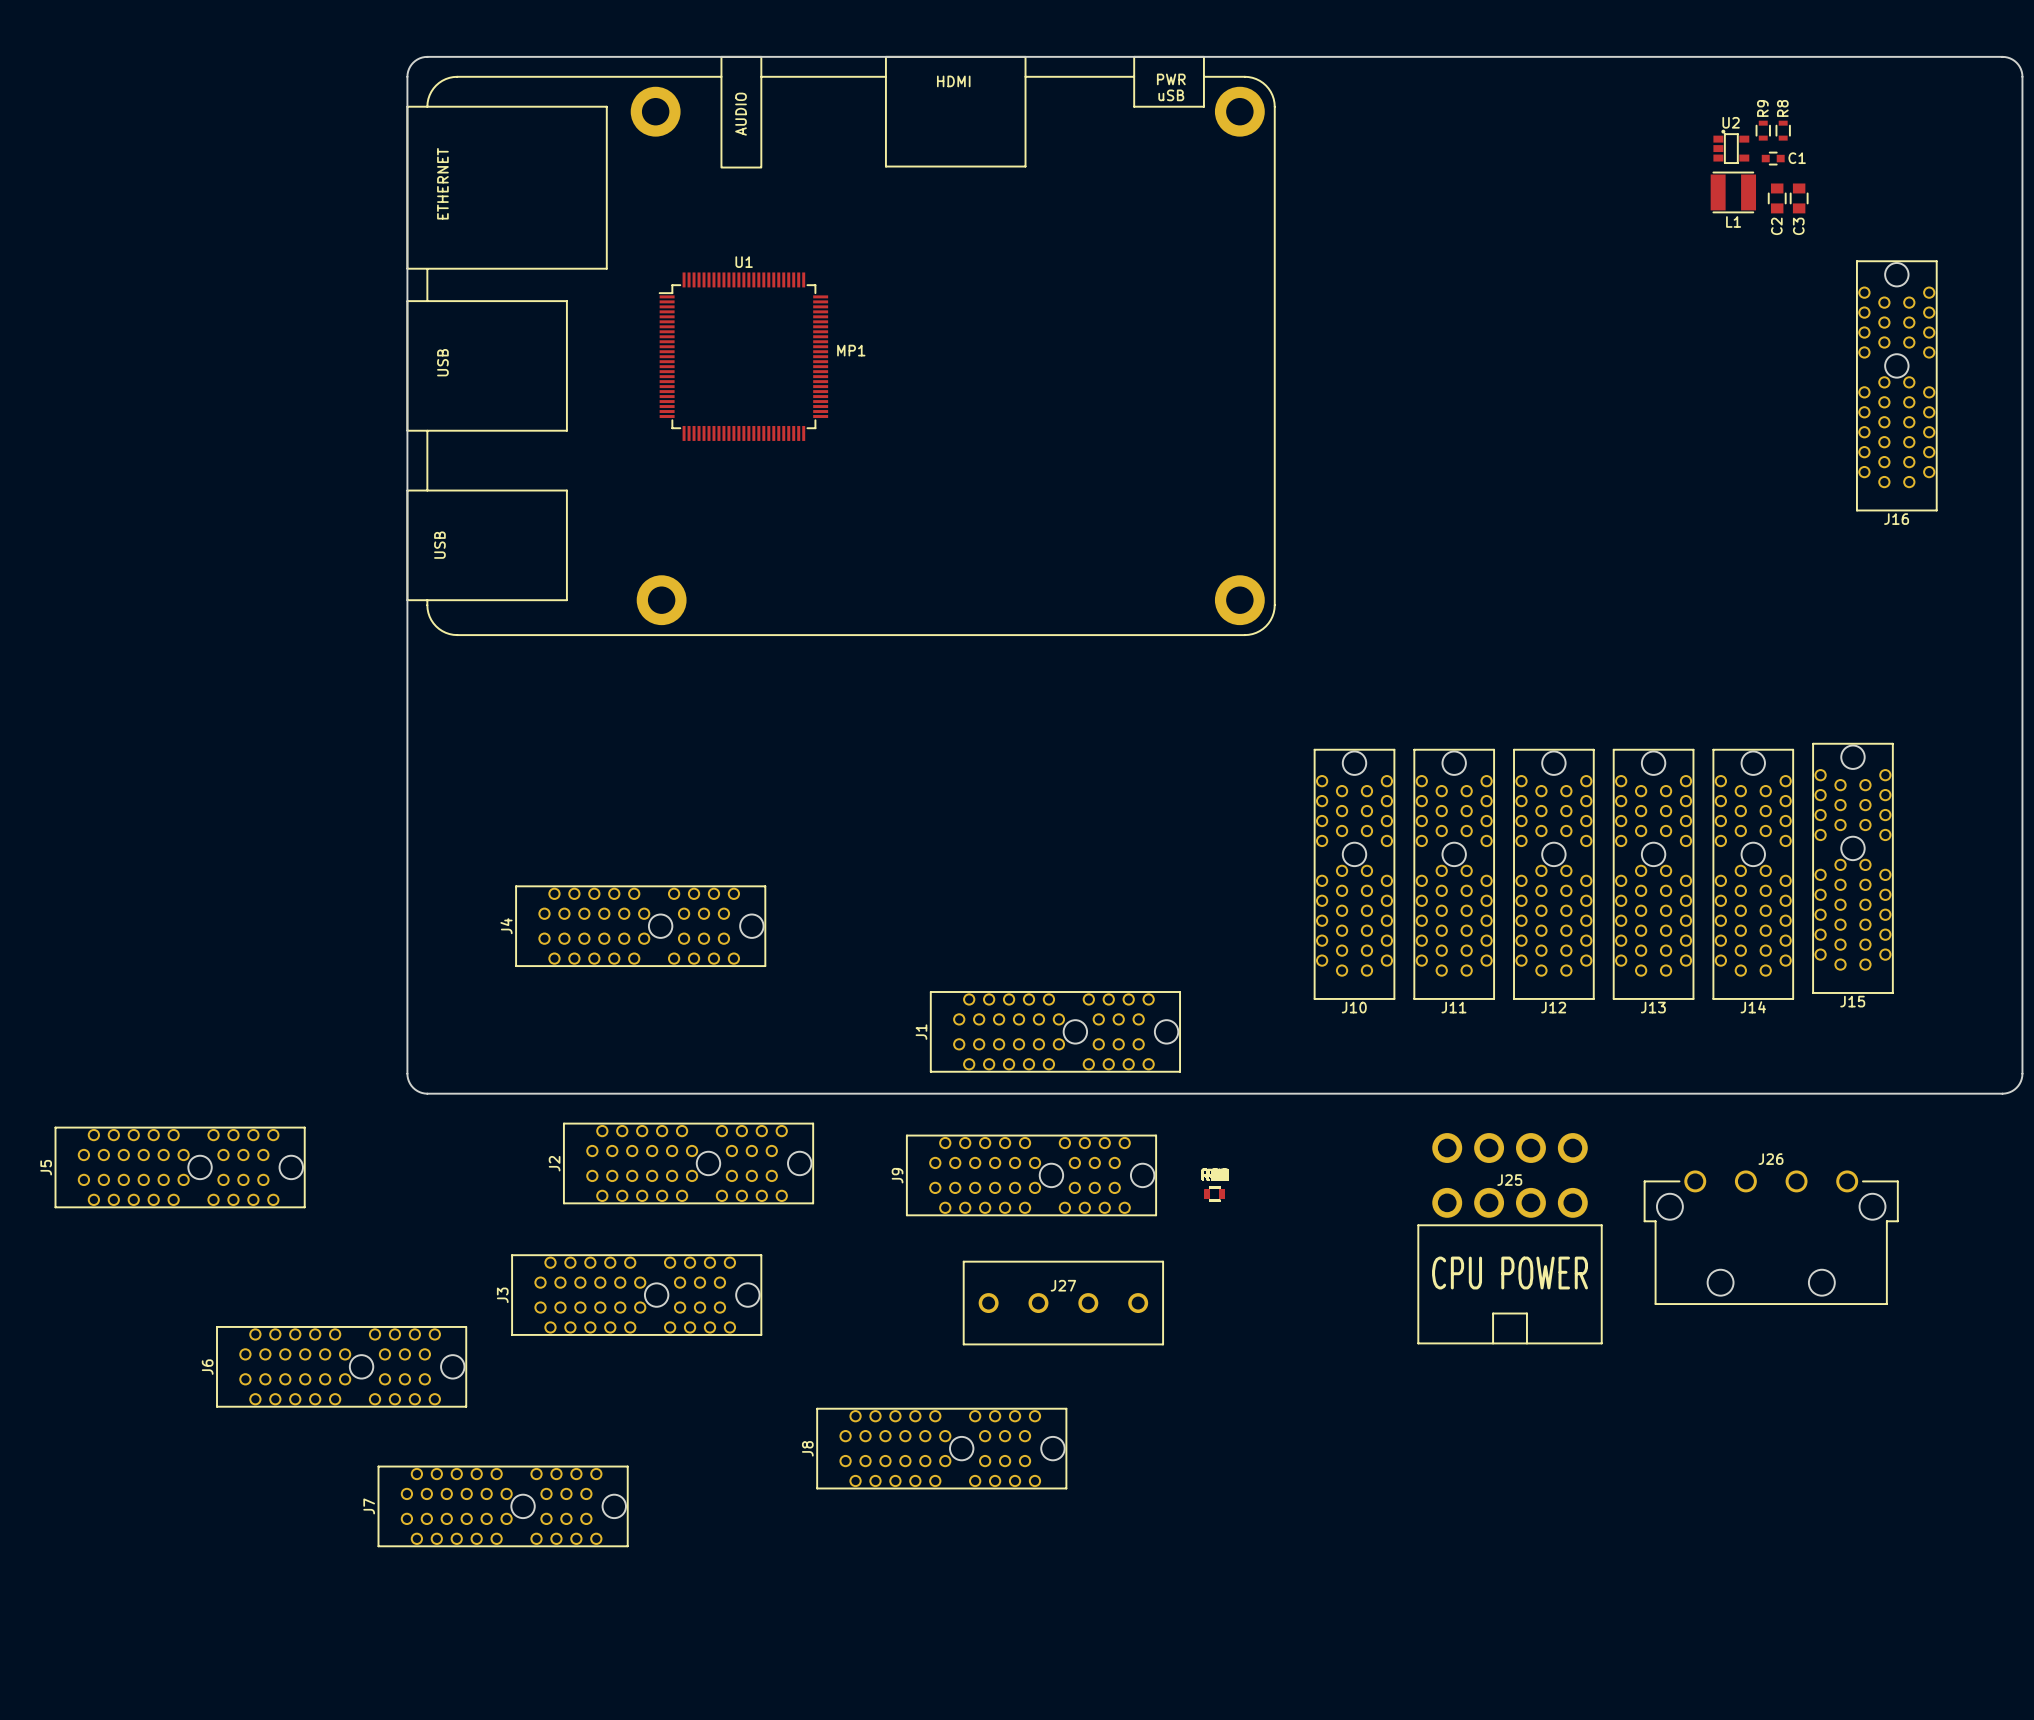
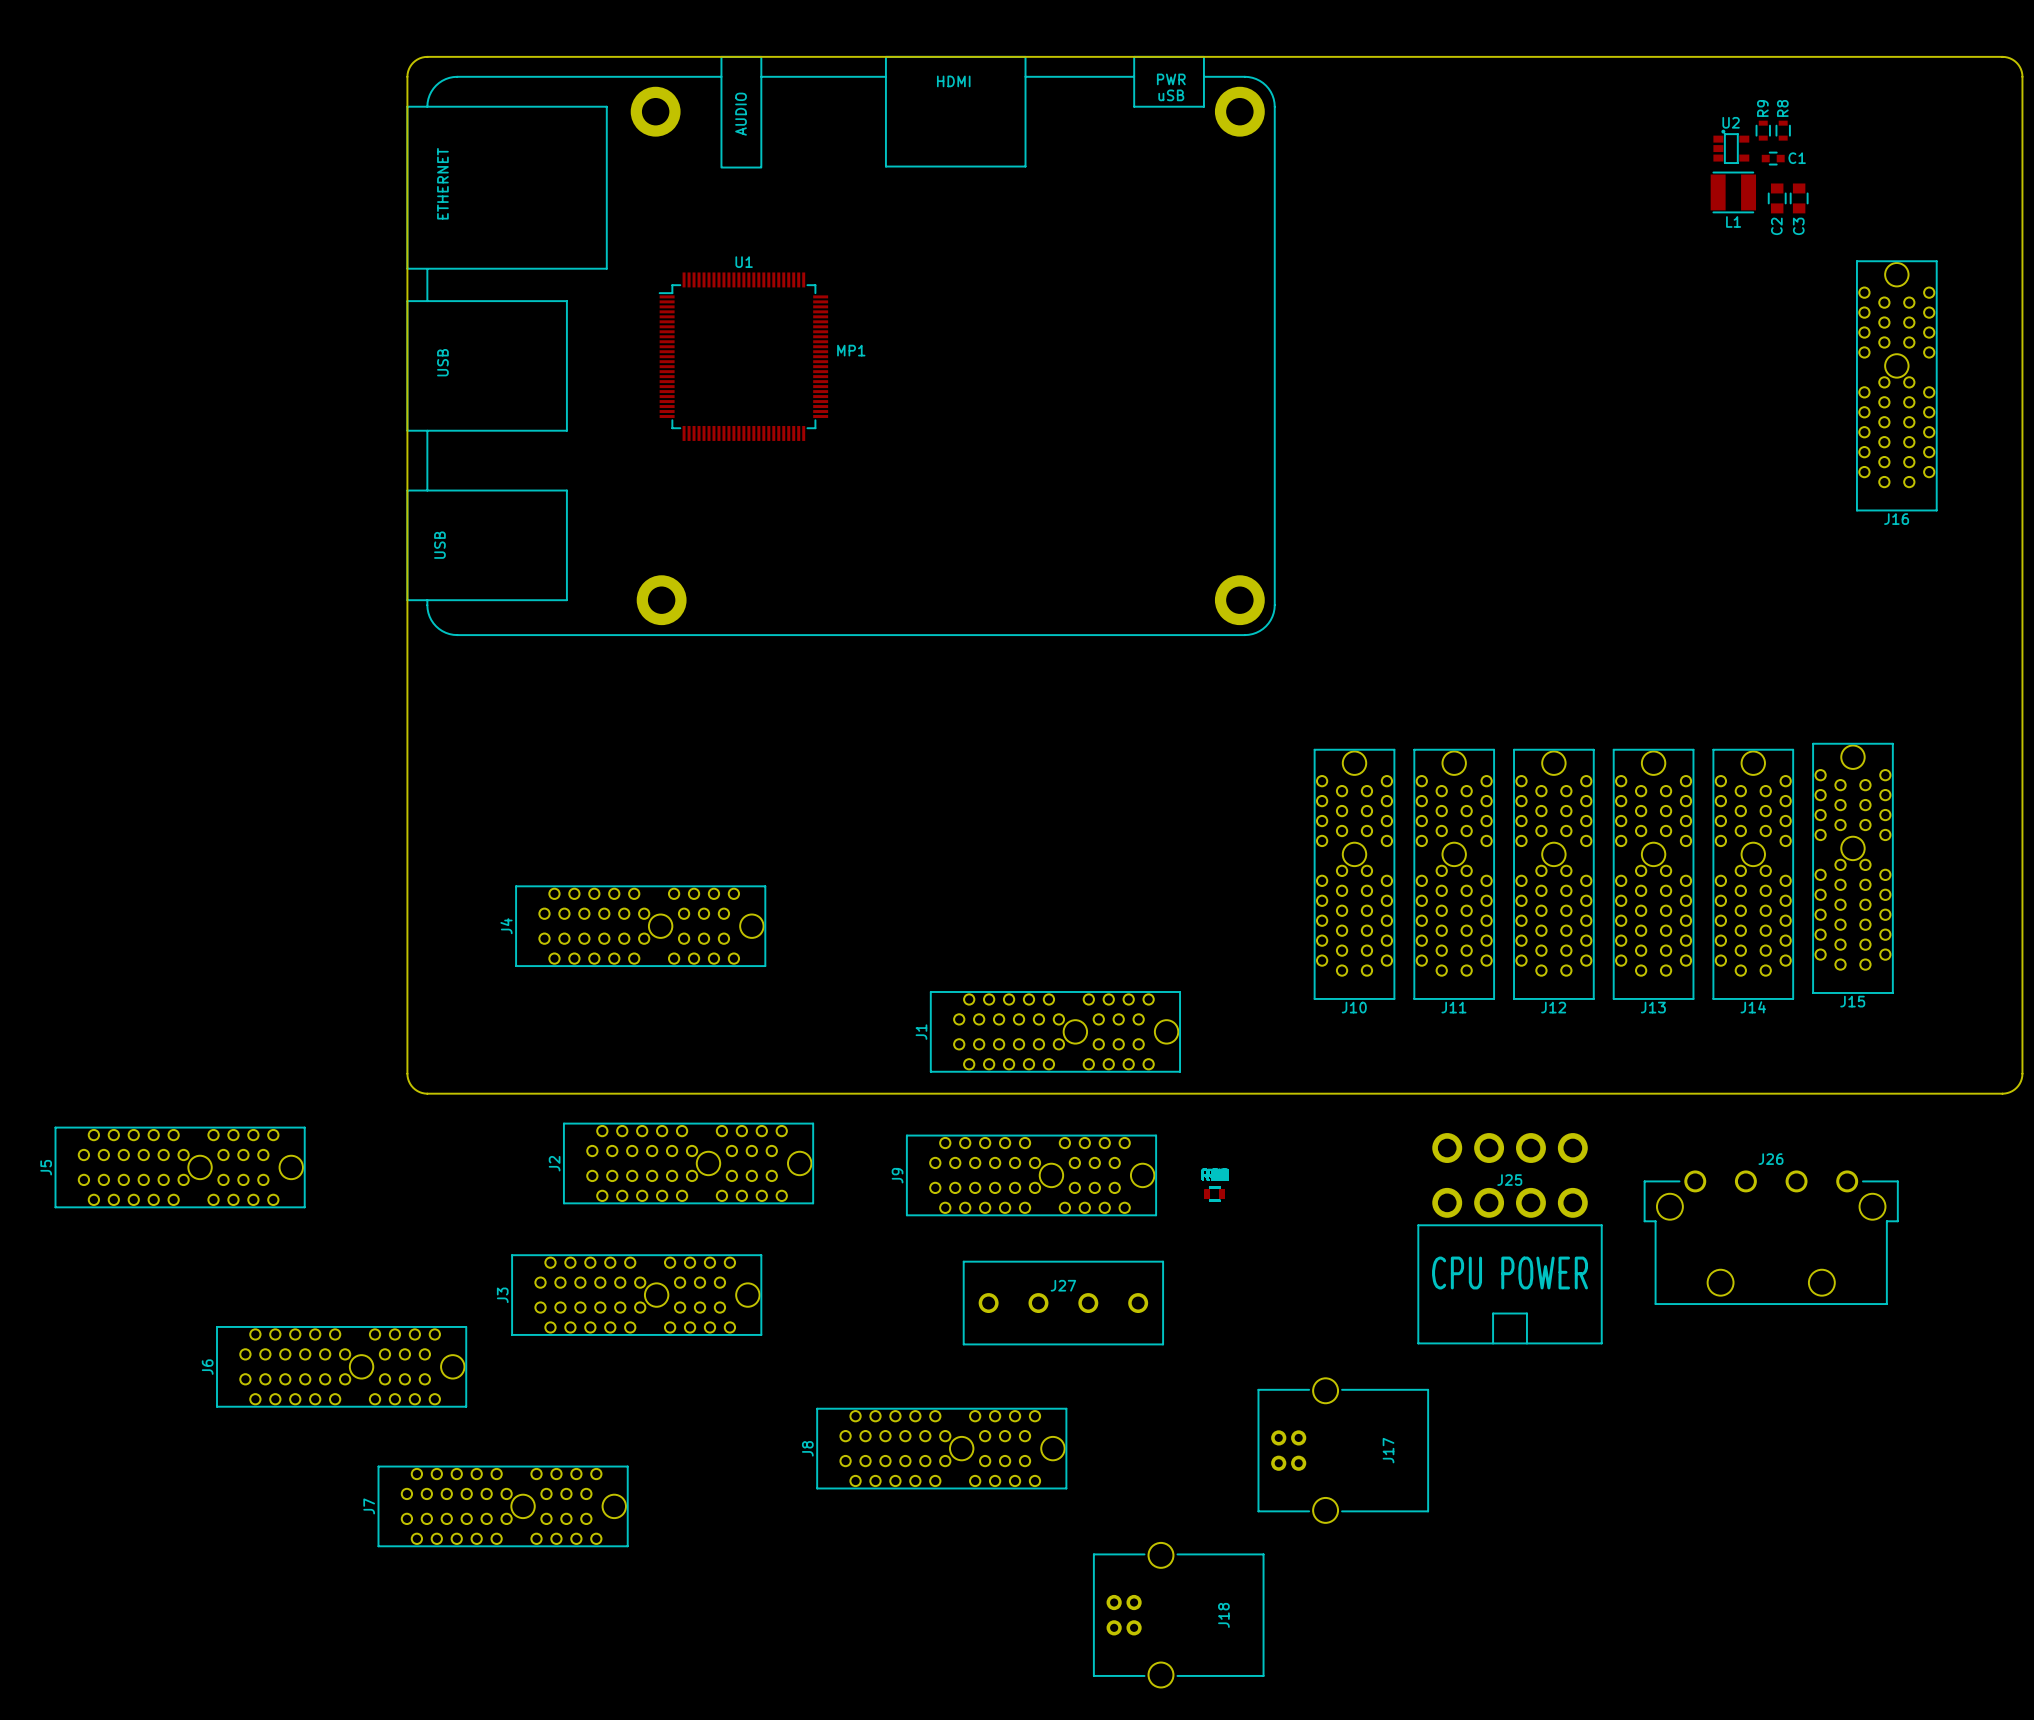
J17: none -> (1343, 1450)
J18: none -> (1178, 1615)

